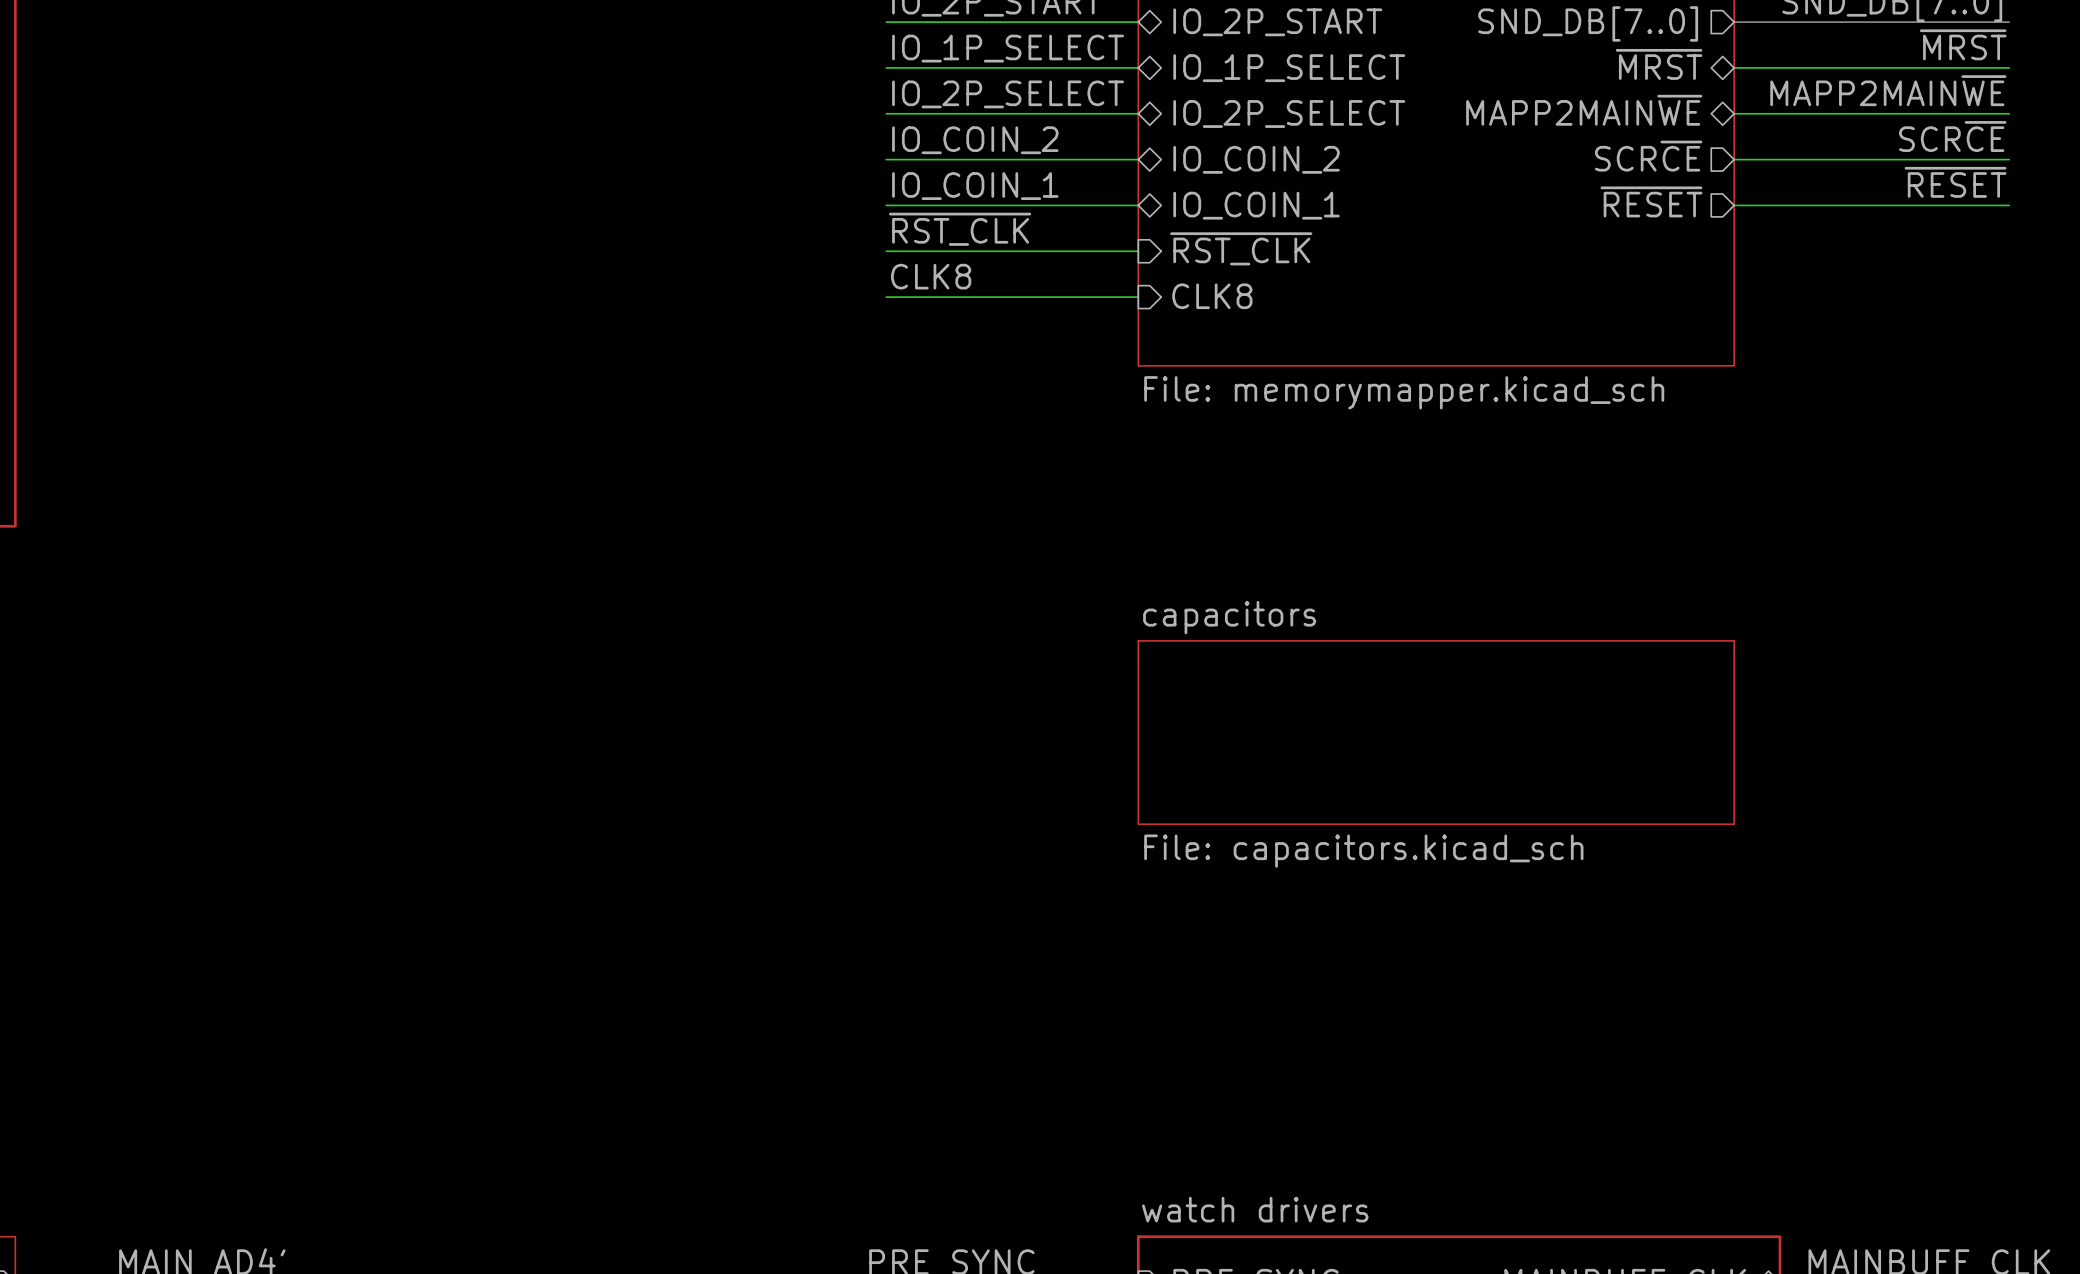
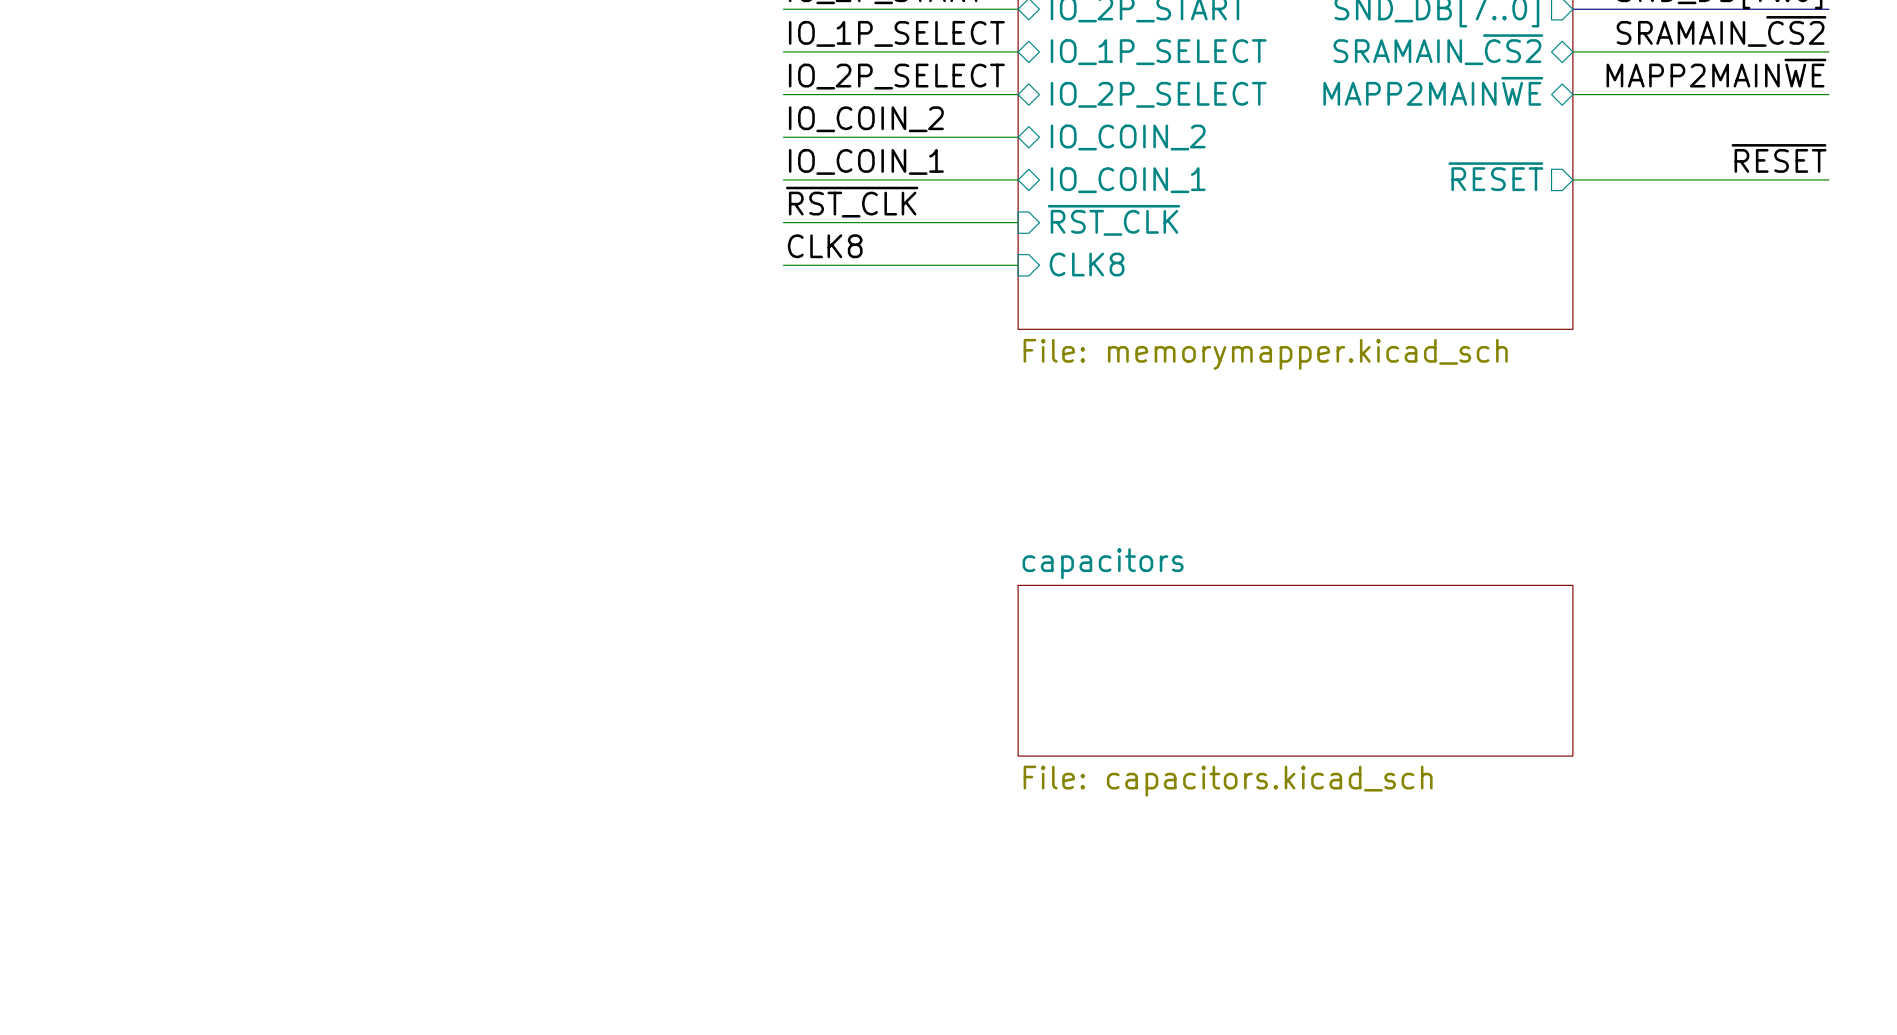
label: ~{MRST} (1963, 44) -> SRAMAIN_~{CS2} (1721, 31)
sheet pin: ~{MRST} (1659, 64) -> SRAMAIN_~{CS2} (1438, 49)
label: SCR~{CE} (1952, 136) -> none
sheet pin: SCR~{CE} (1648, 156) -> none
wire: (1734, 159) (2009, 159) -> none

